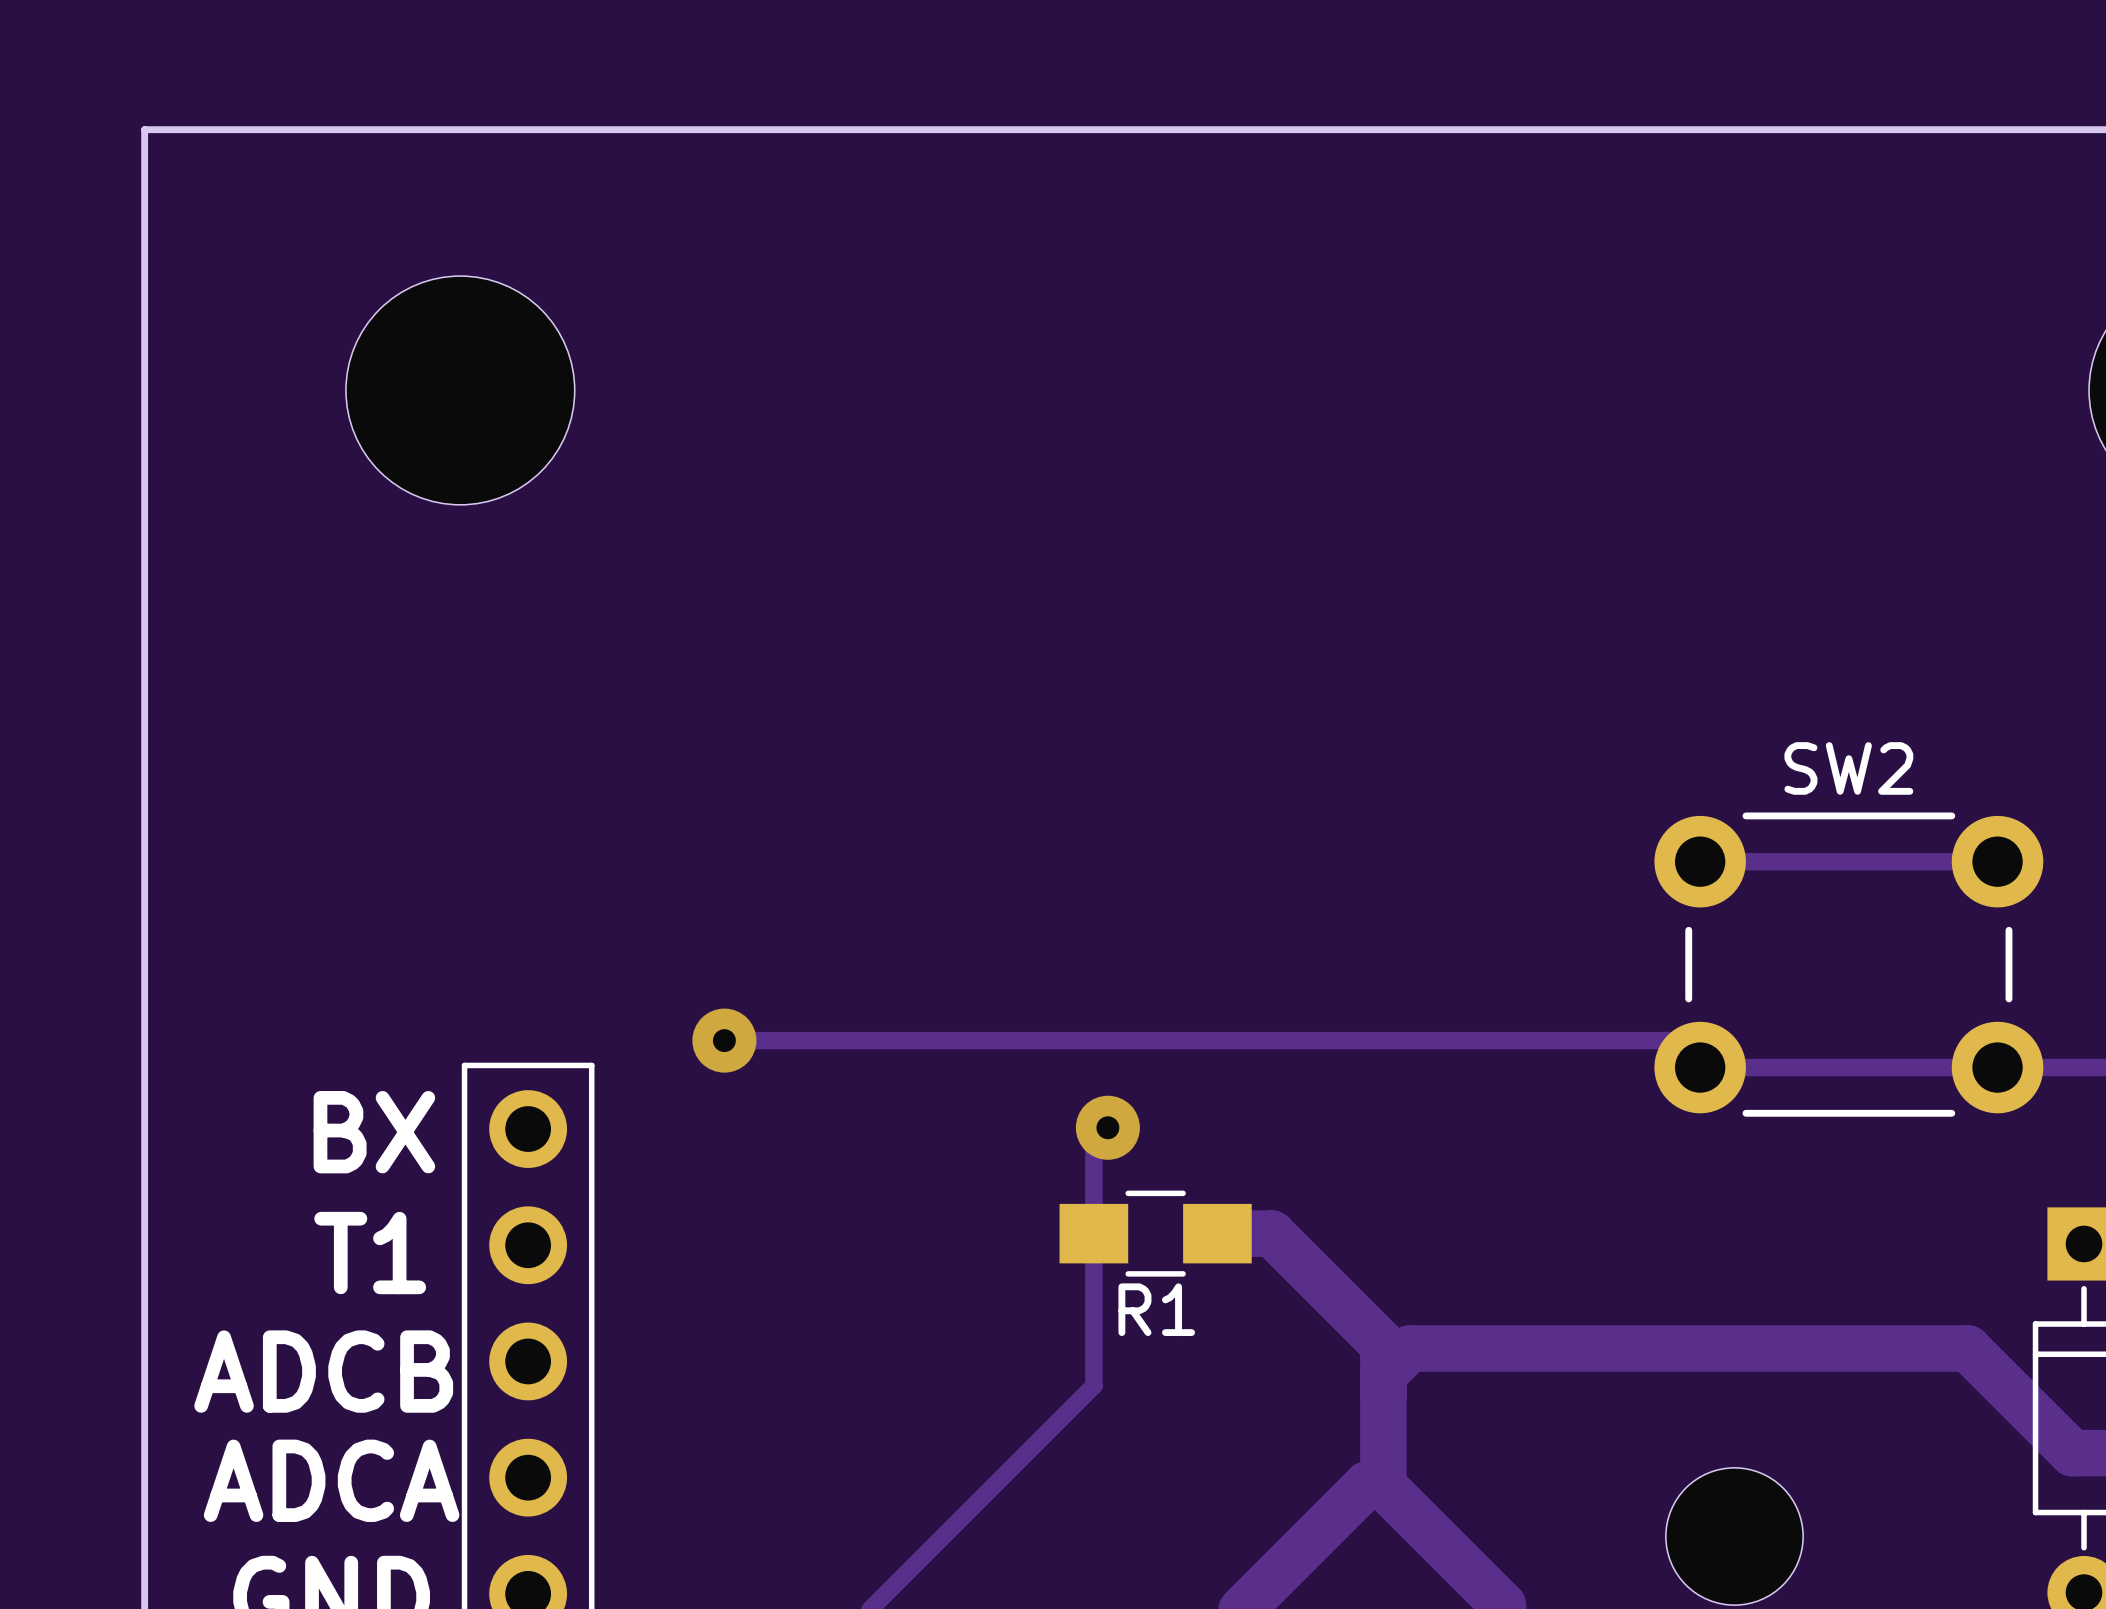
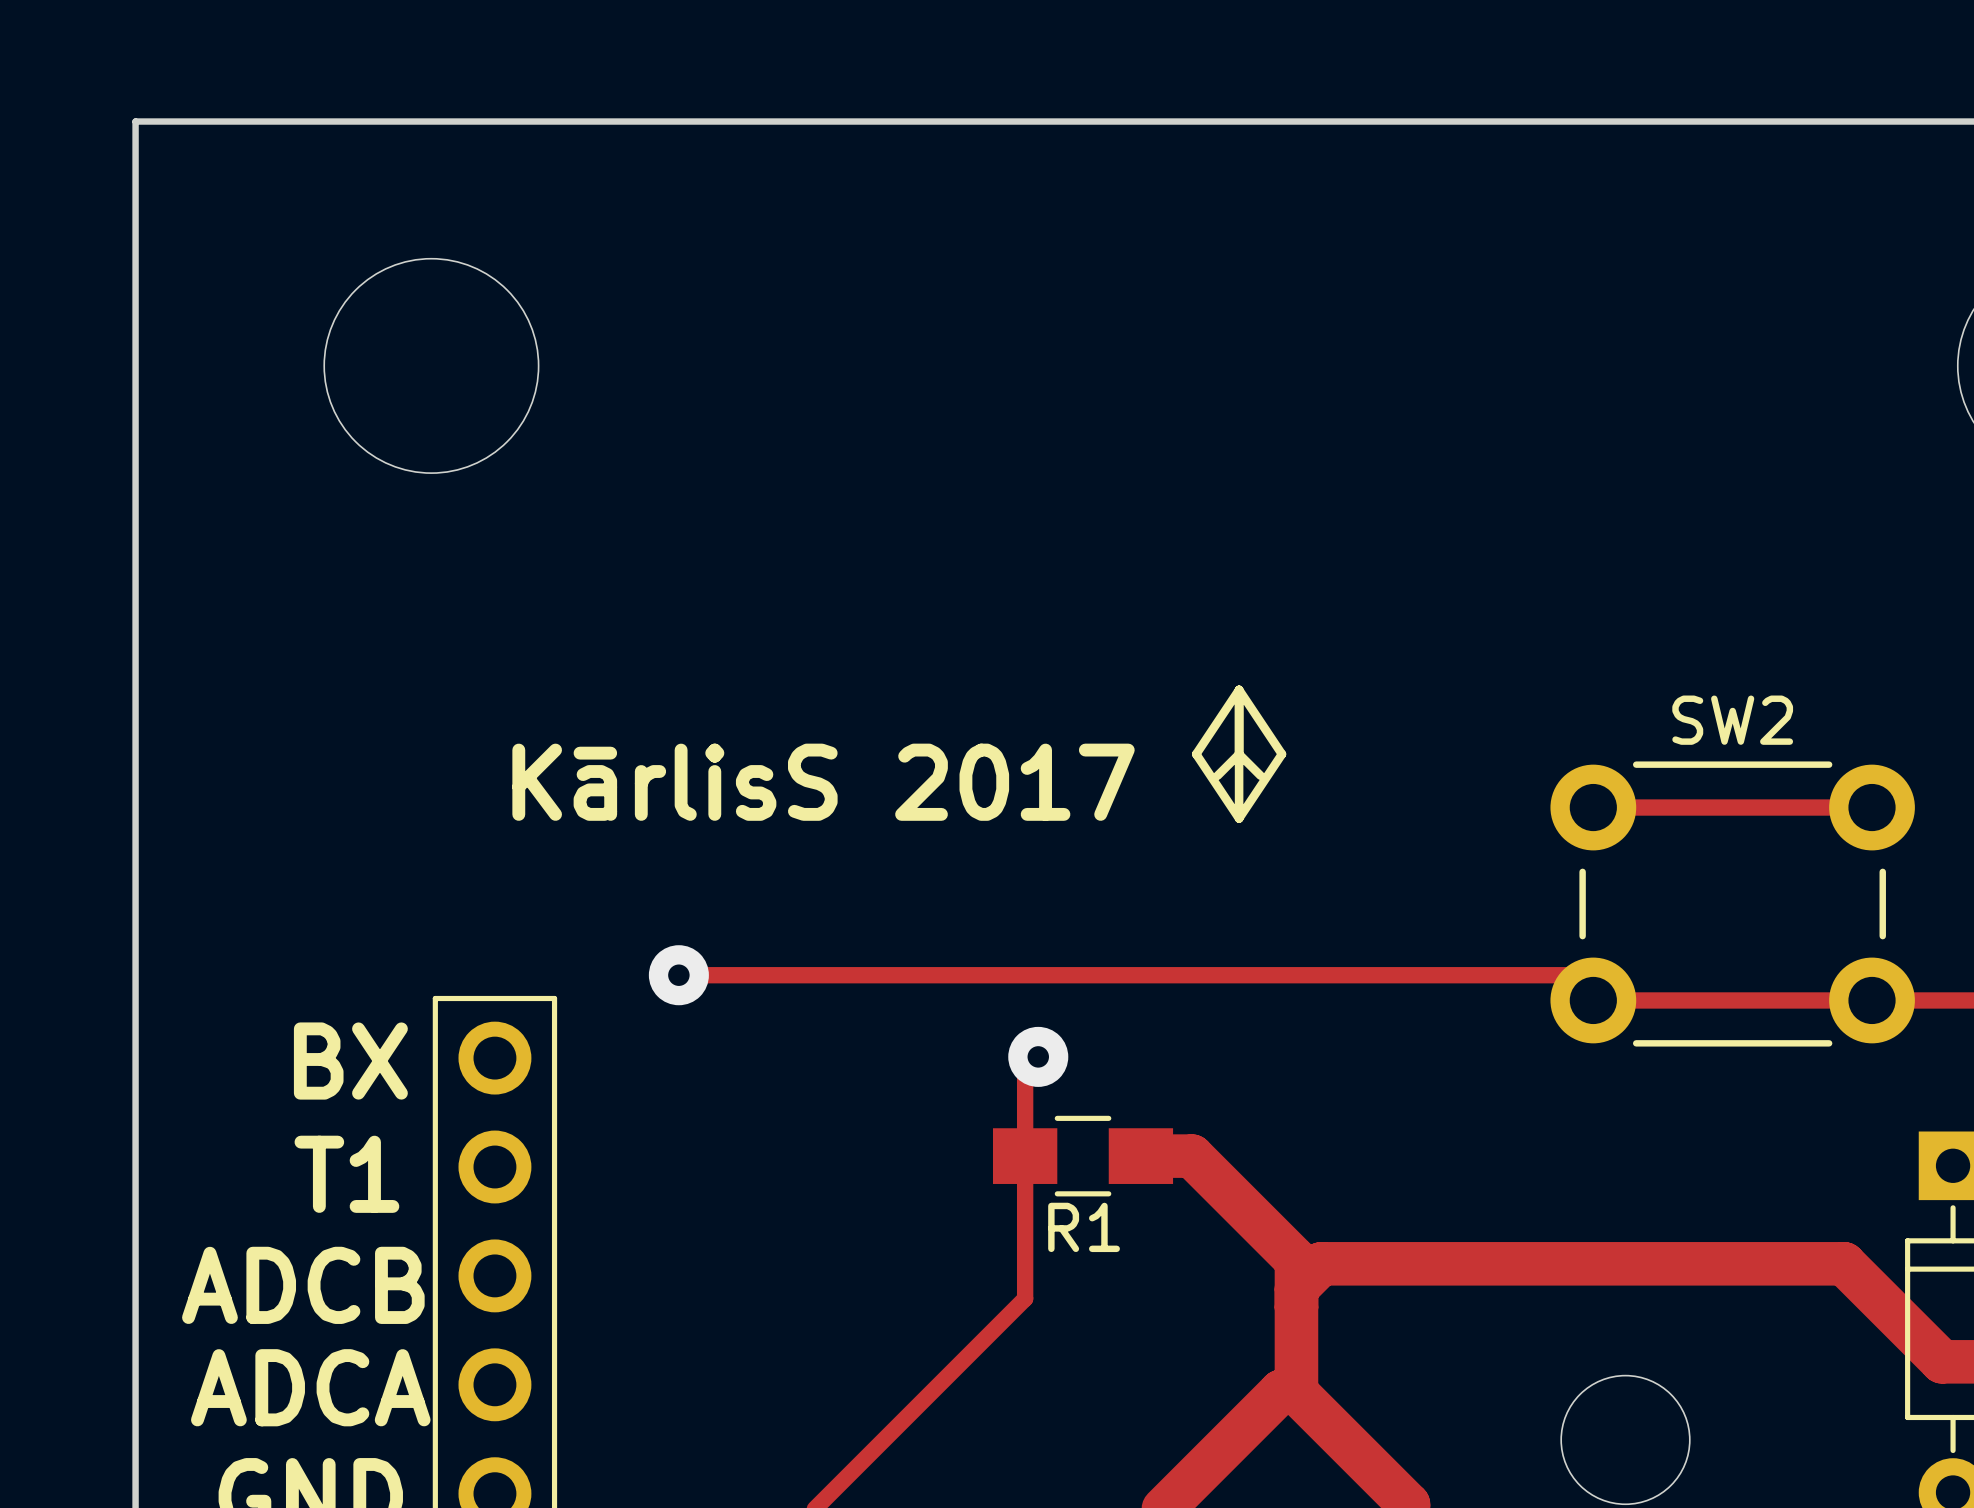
line: none -> (1239, 689) (1239, 818)
line: none -> (1239, 689) (1281, 754) (1239, 818)
line: none -> (1239, 689) (1196, 754) (1239, 818)
line: none -> (1217, 775) (1239, 754) (1260, 775)
text: none -> KārlisS 2017 (823, 782)

